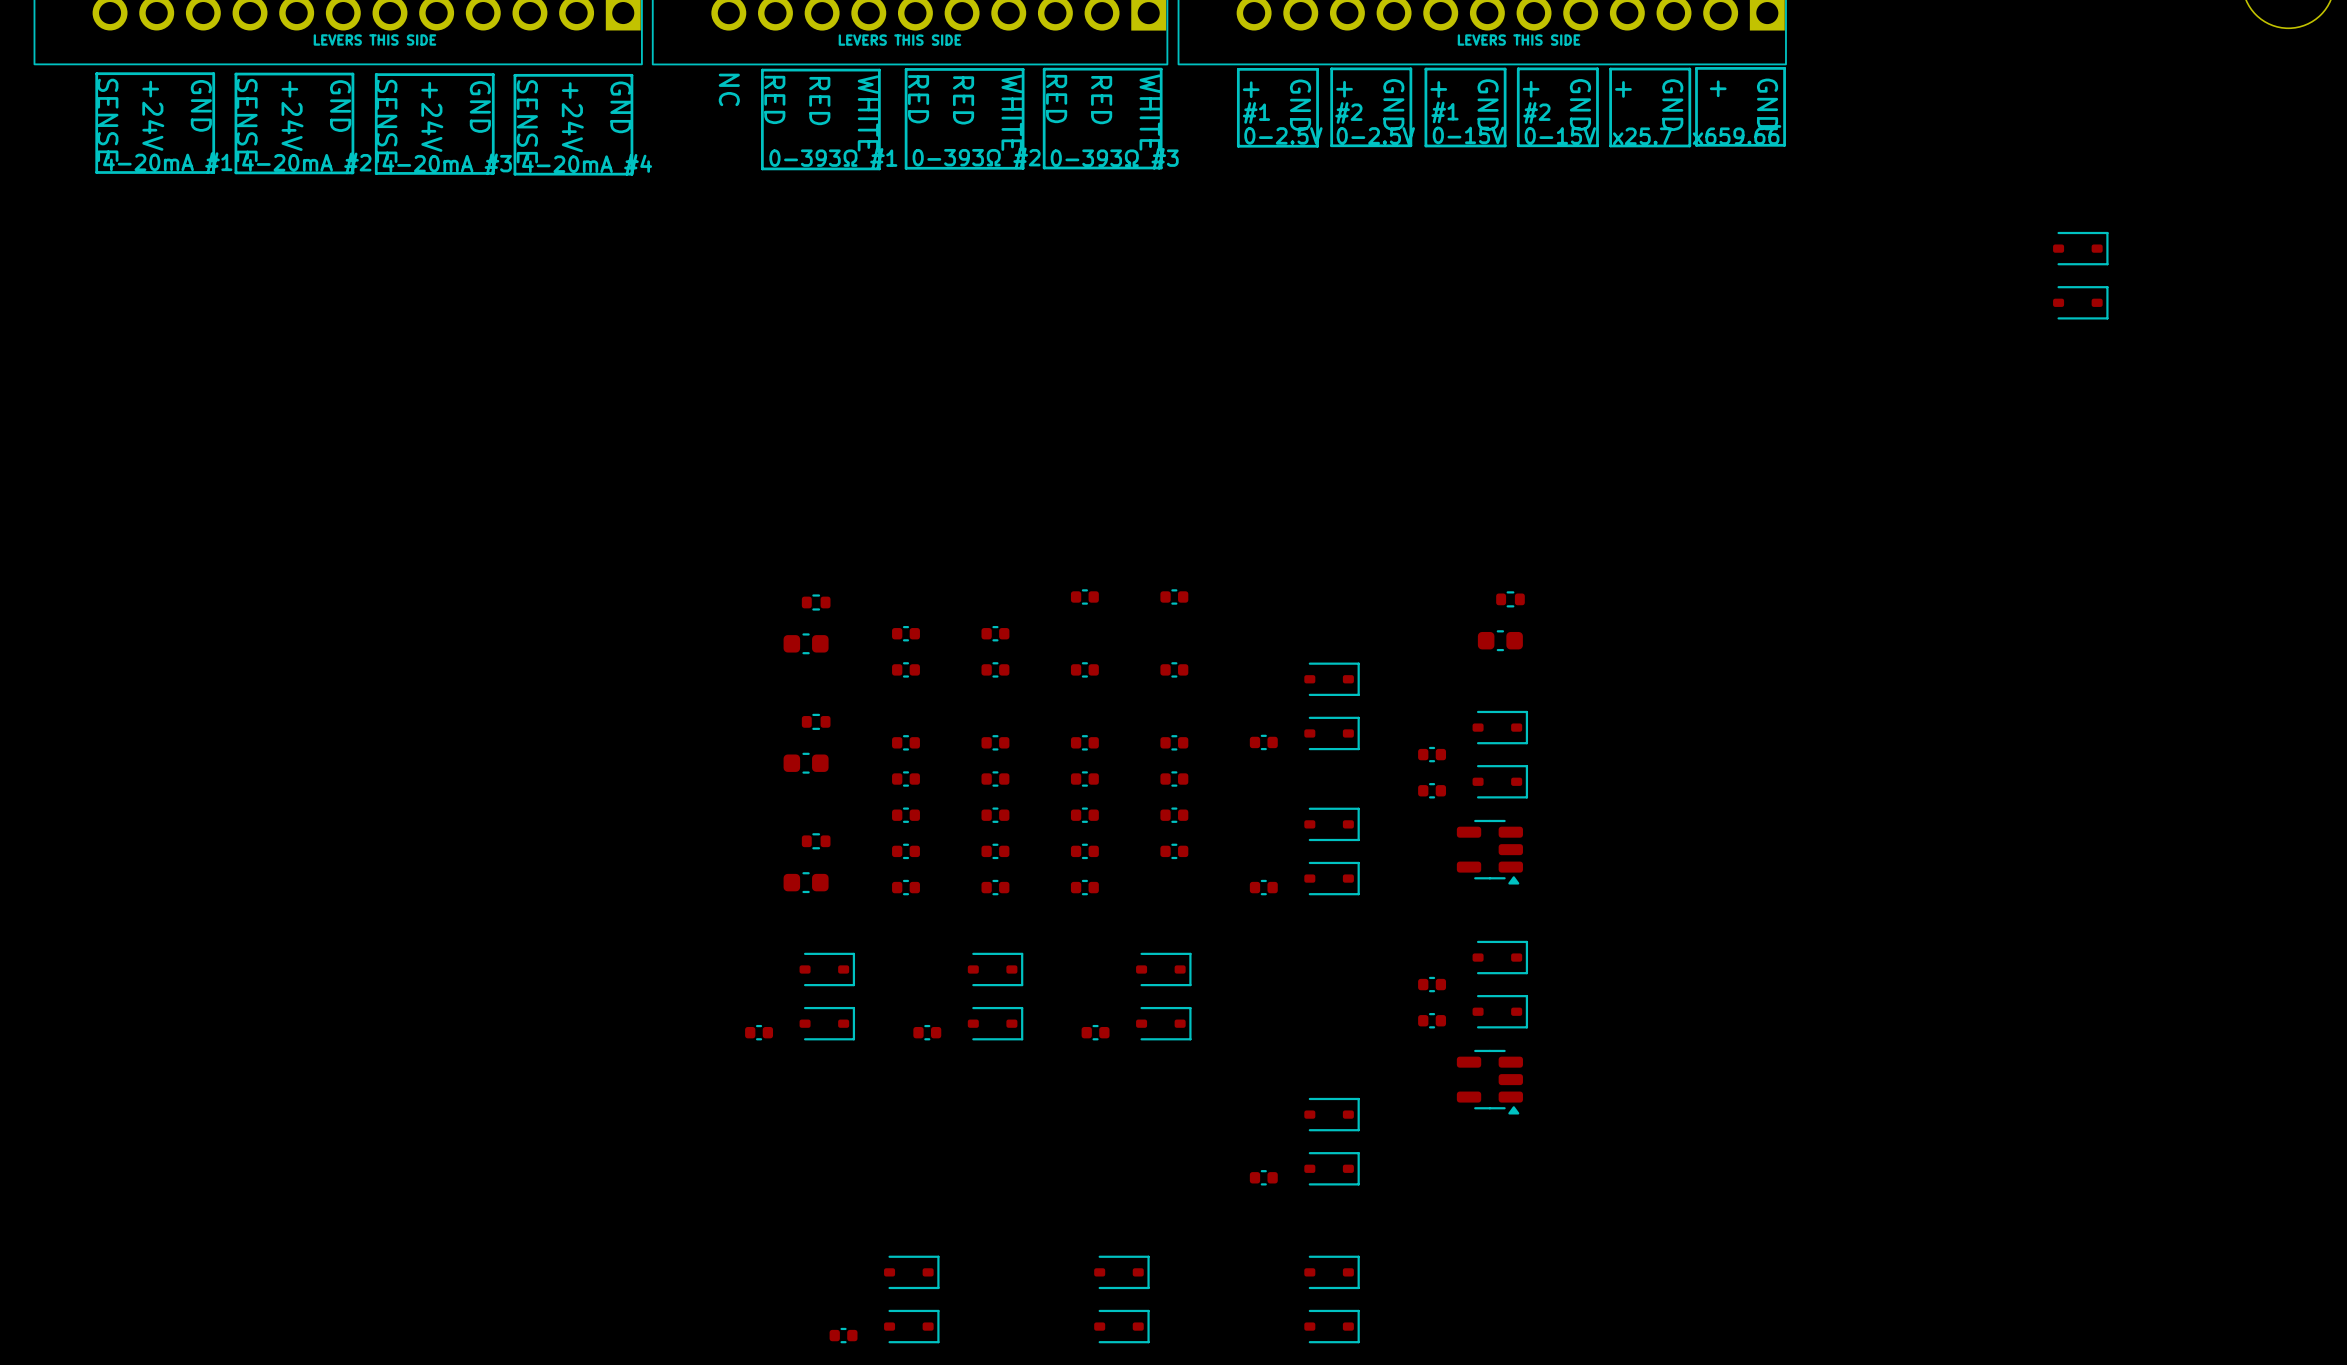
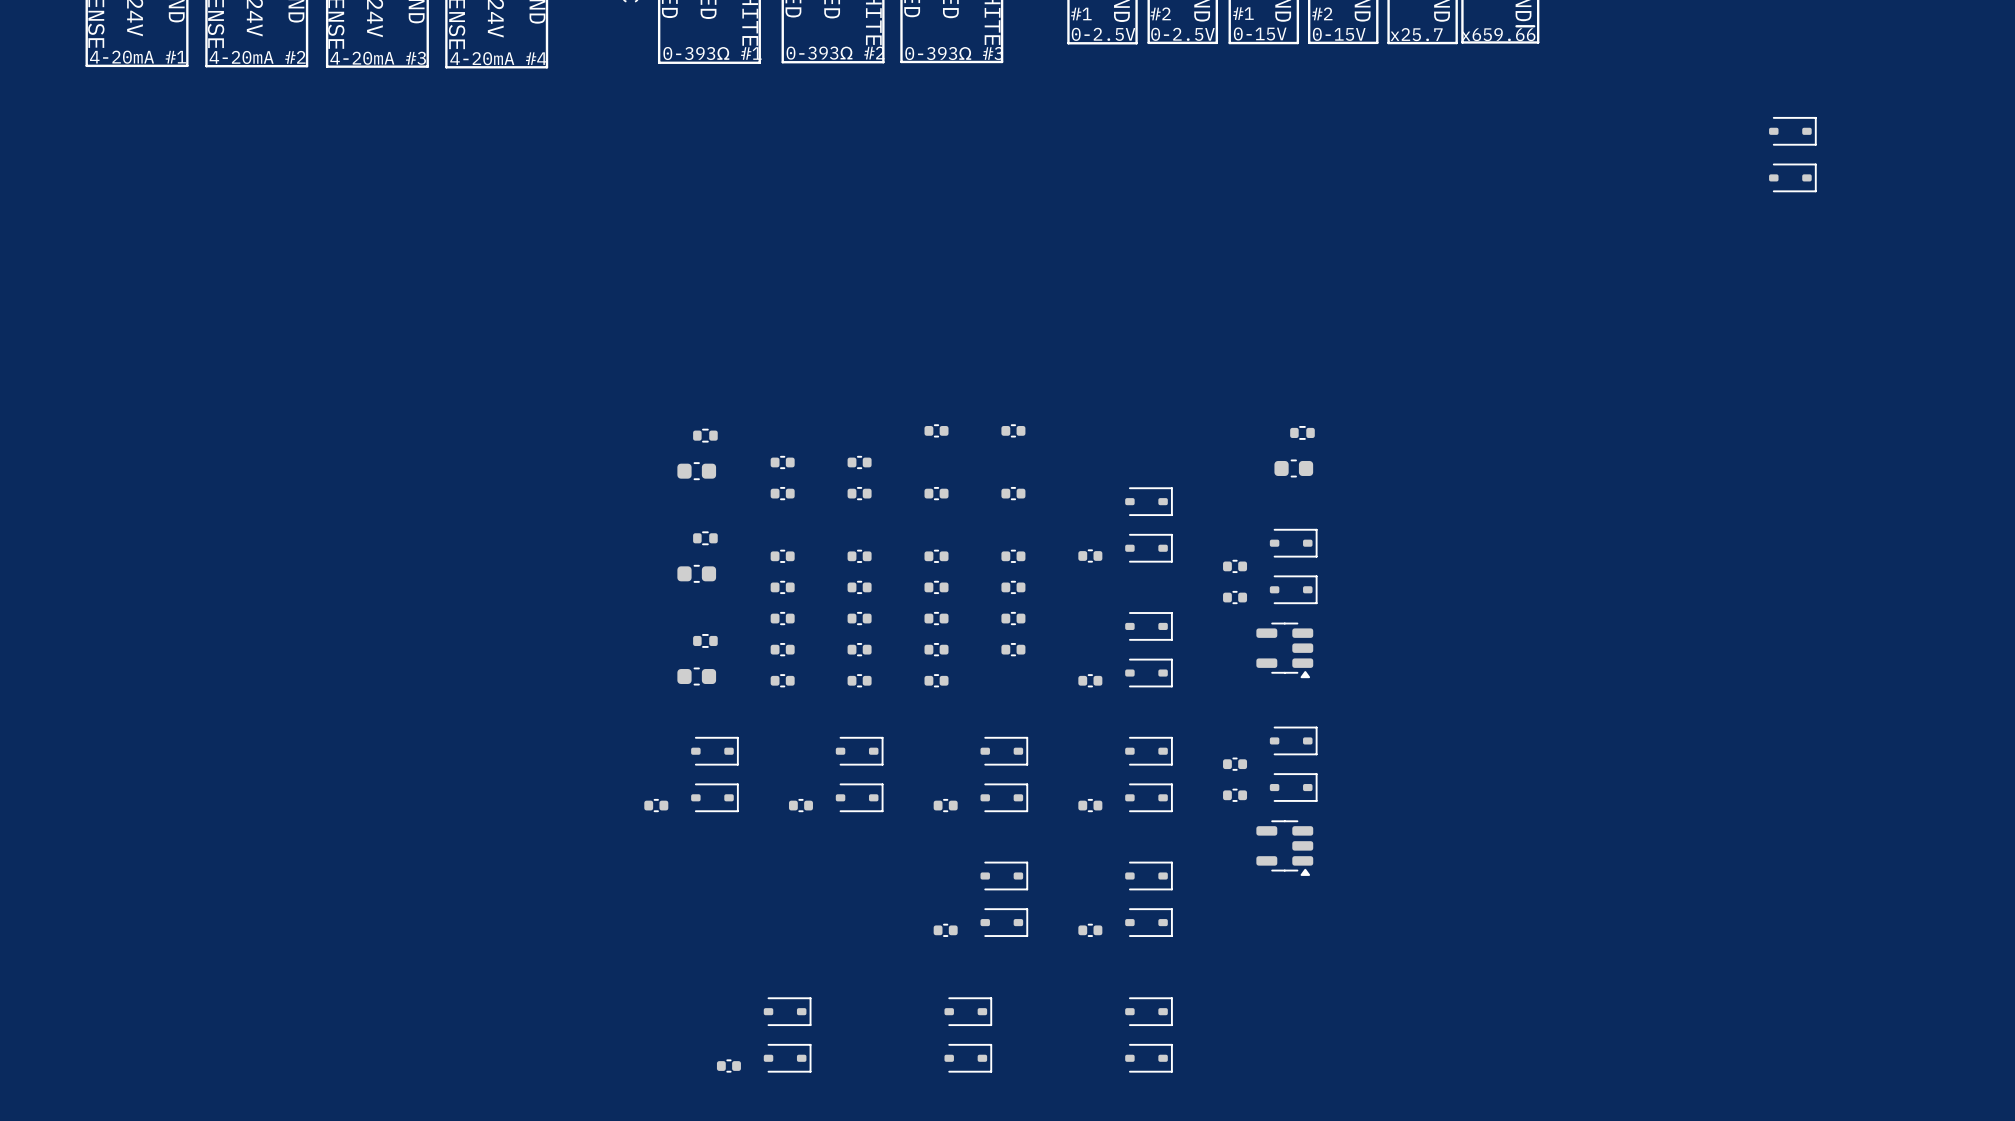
part: none -> (1149, 751)
part: none -> (1149, 797)
part: none -> (1090, 805)
part: none -> (1004, 875)
part: none -> (1004, 922)
part: none -> (945, 930)

